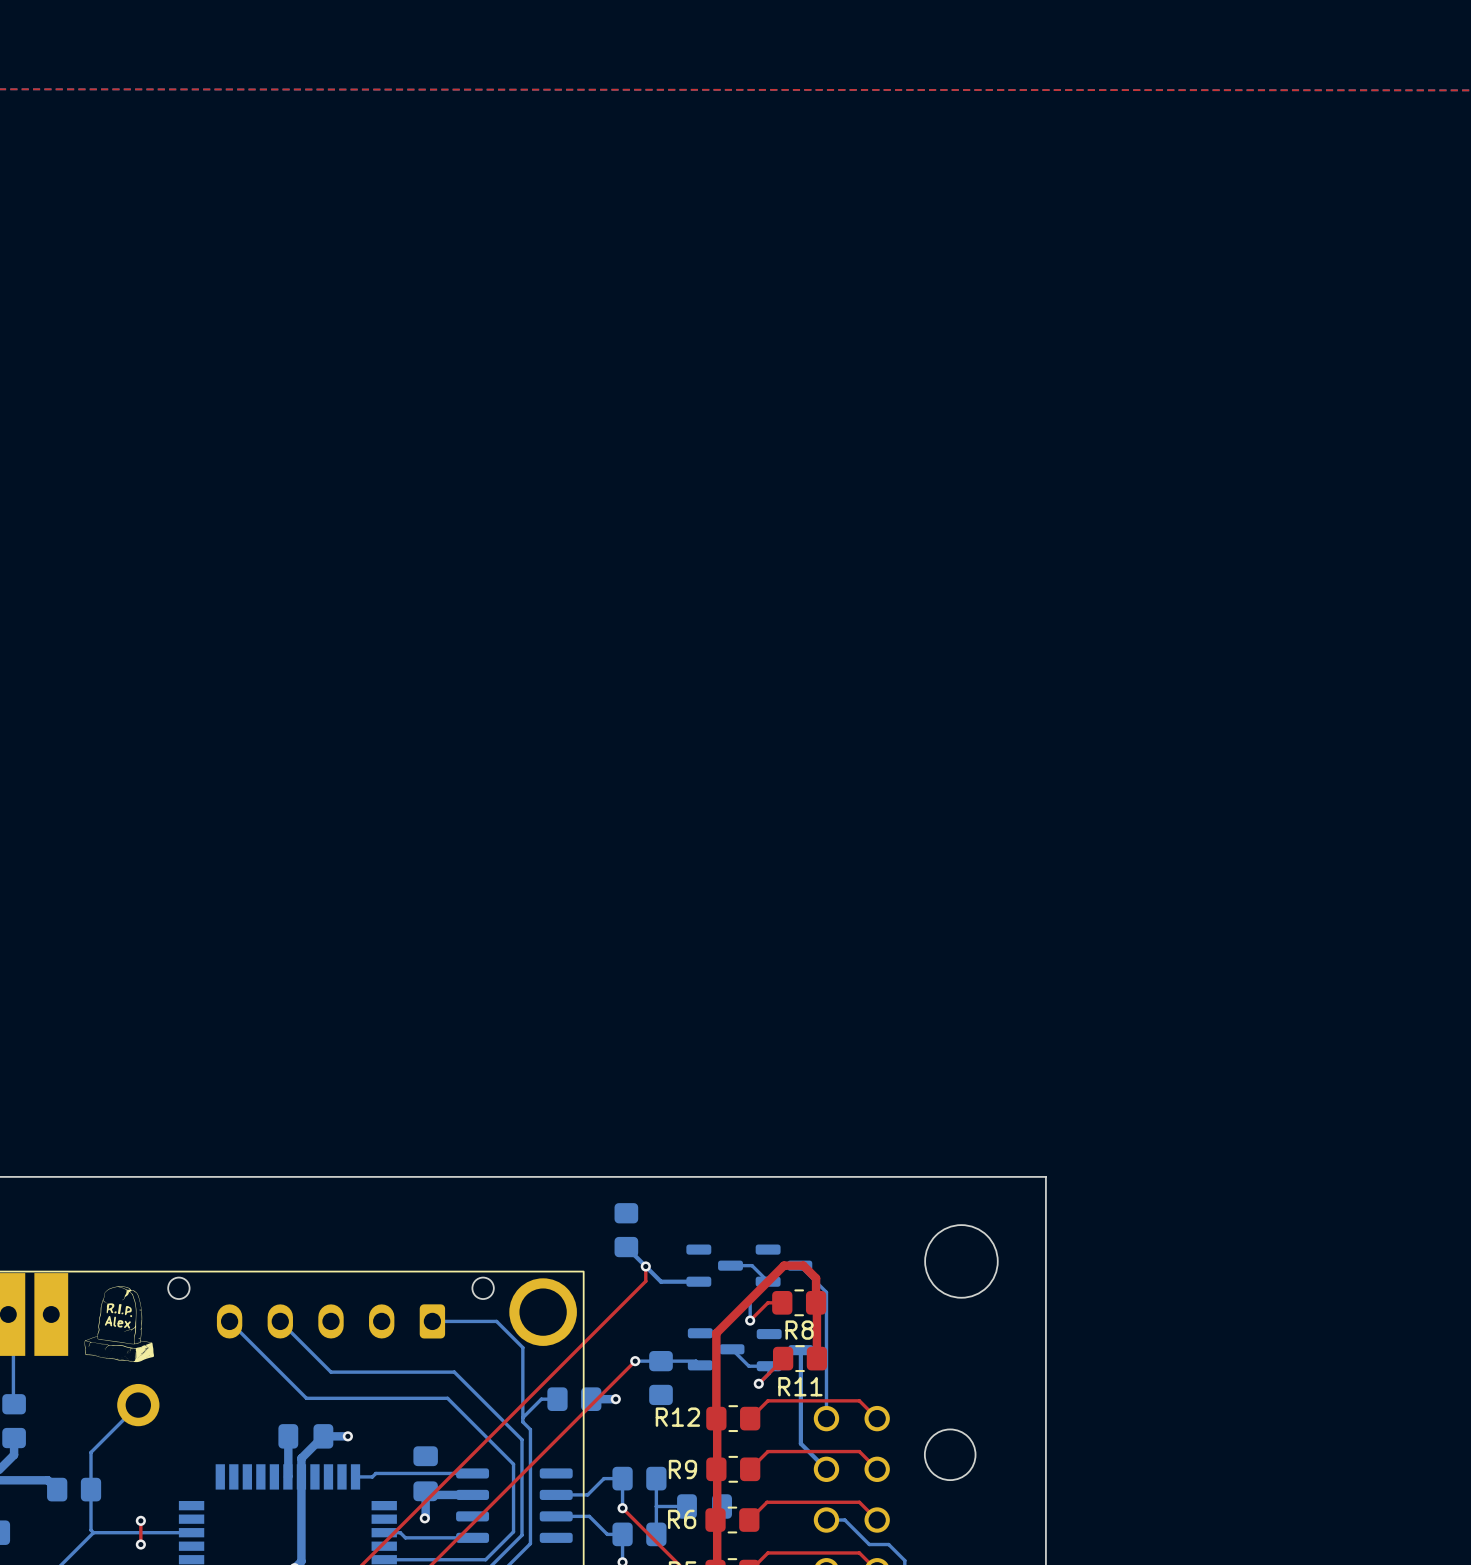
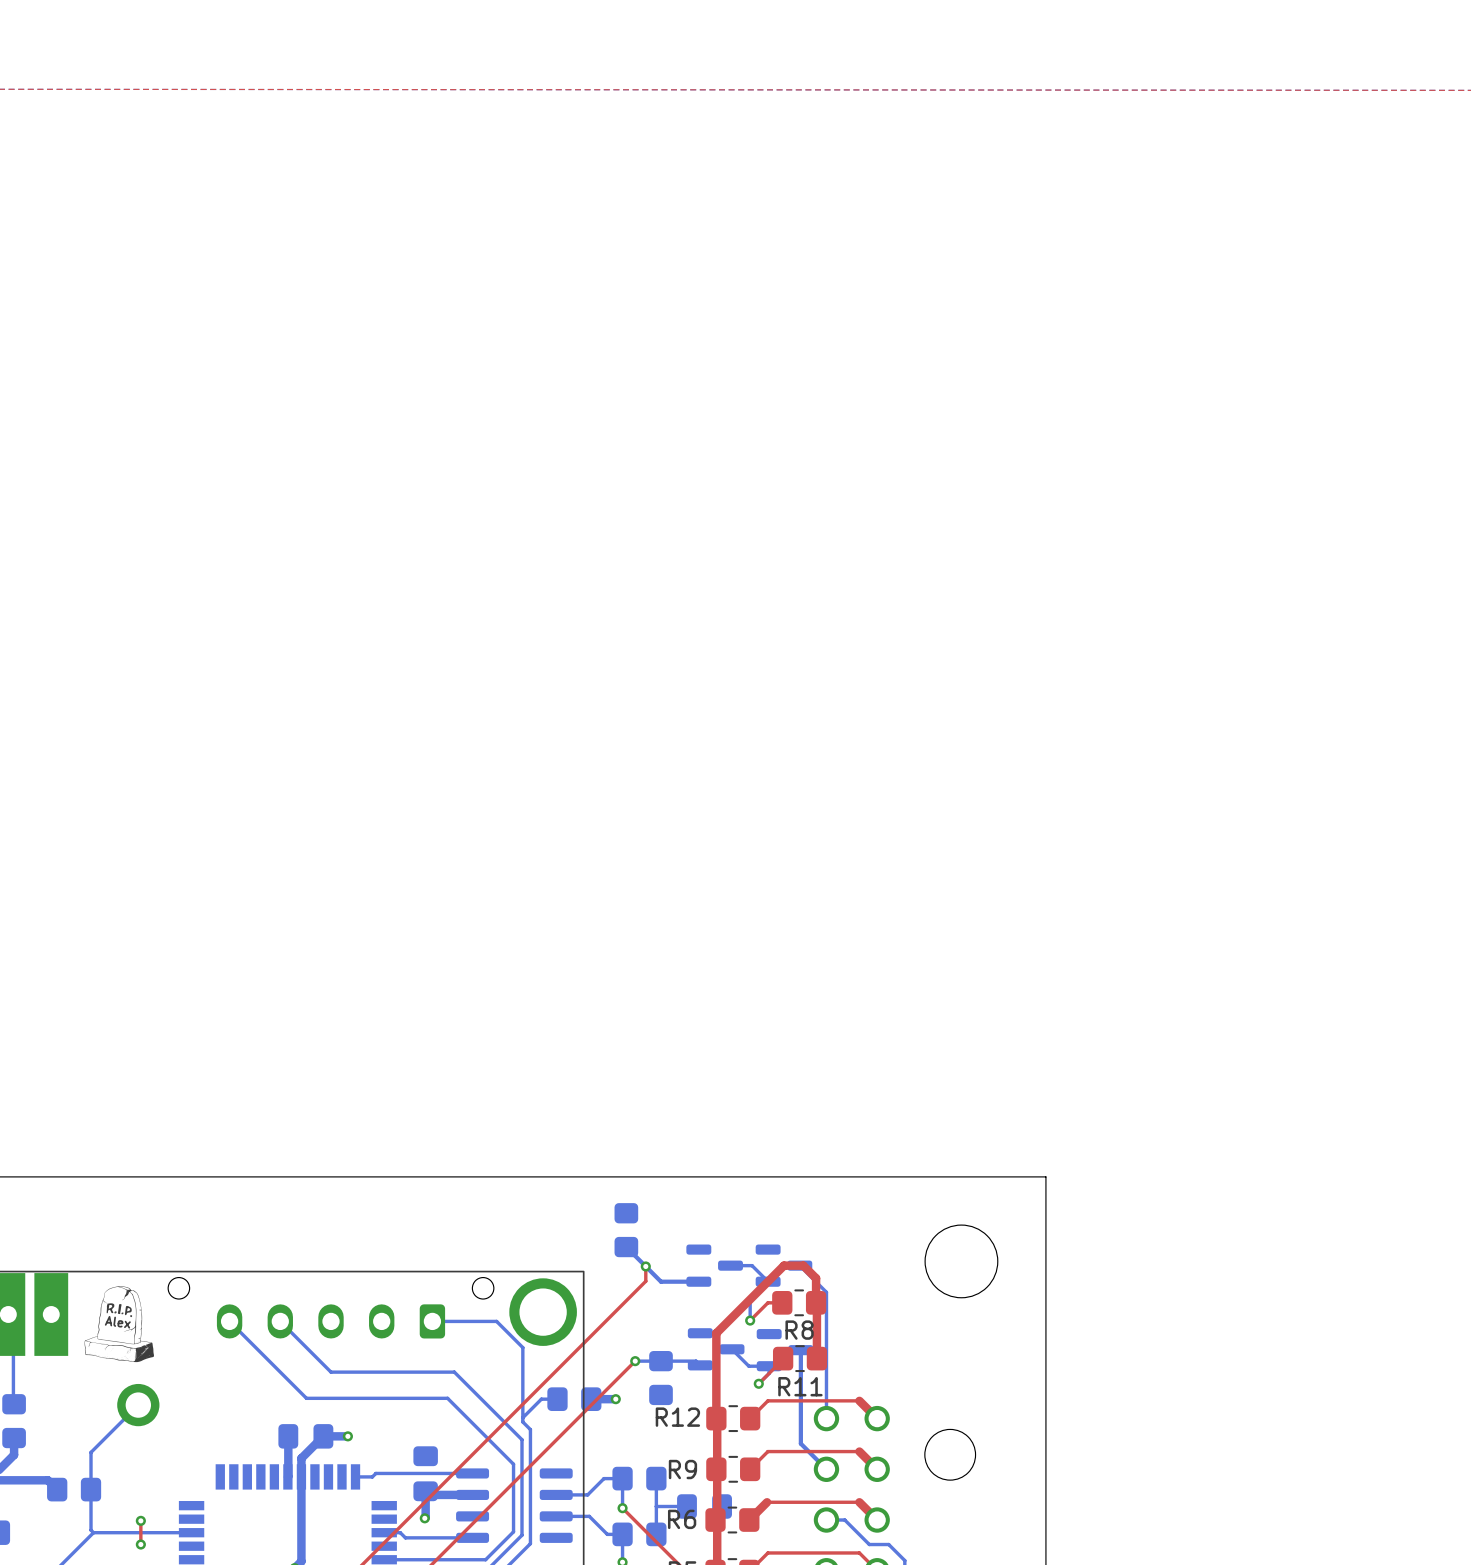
top track width: thin (859, 1400) (877, 1418) -> thick (859, 1400) (877, 1418)
top track width: thin (859, 1451) (877, 1469) -> thick (859, 1451) (877, 1469)
top track width: thin (767, 1502) (749, 1520) -> thick (767, 1502) (749, 1520)
top track width: thin (859, 1502) (877, 1520) -> thick (859, 1502) (877, 1520)

